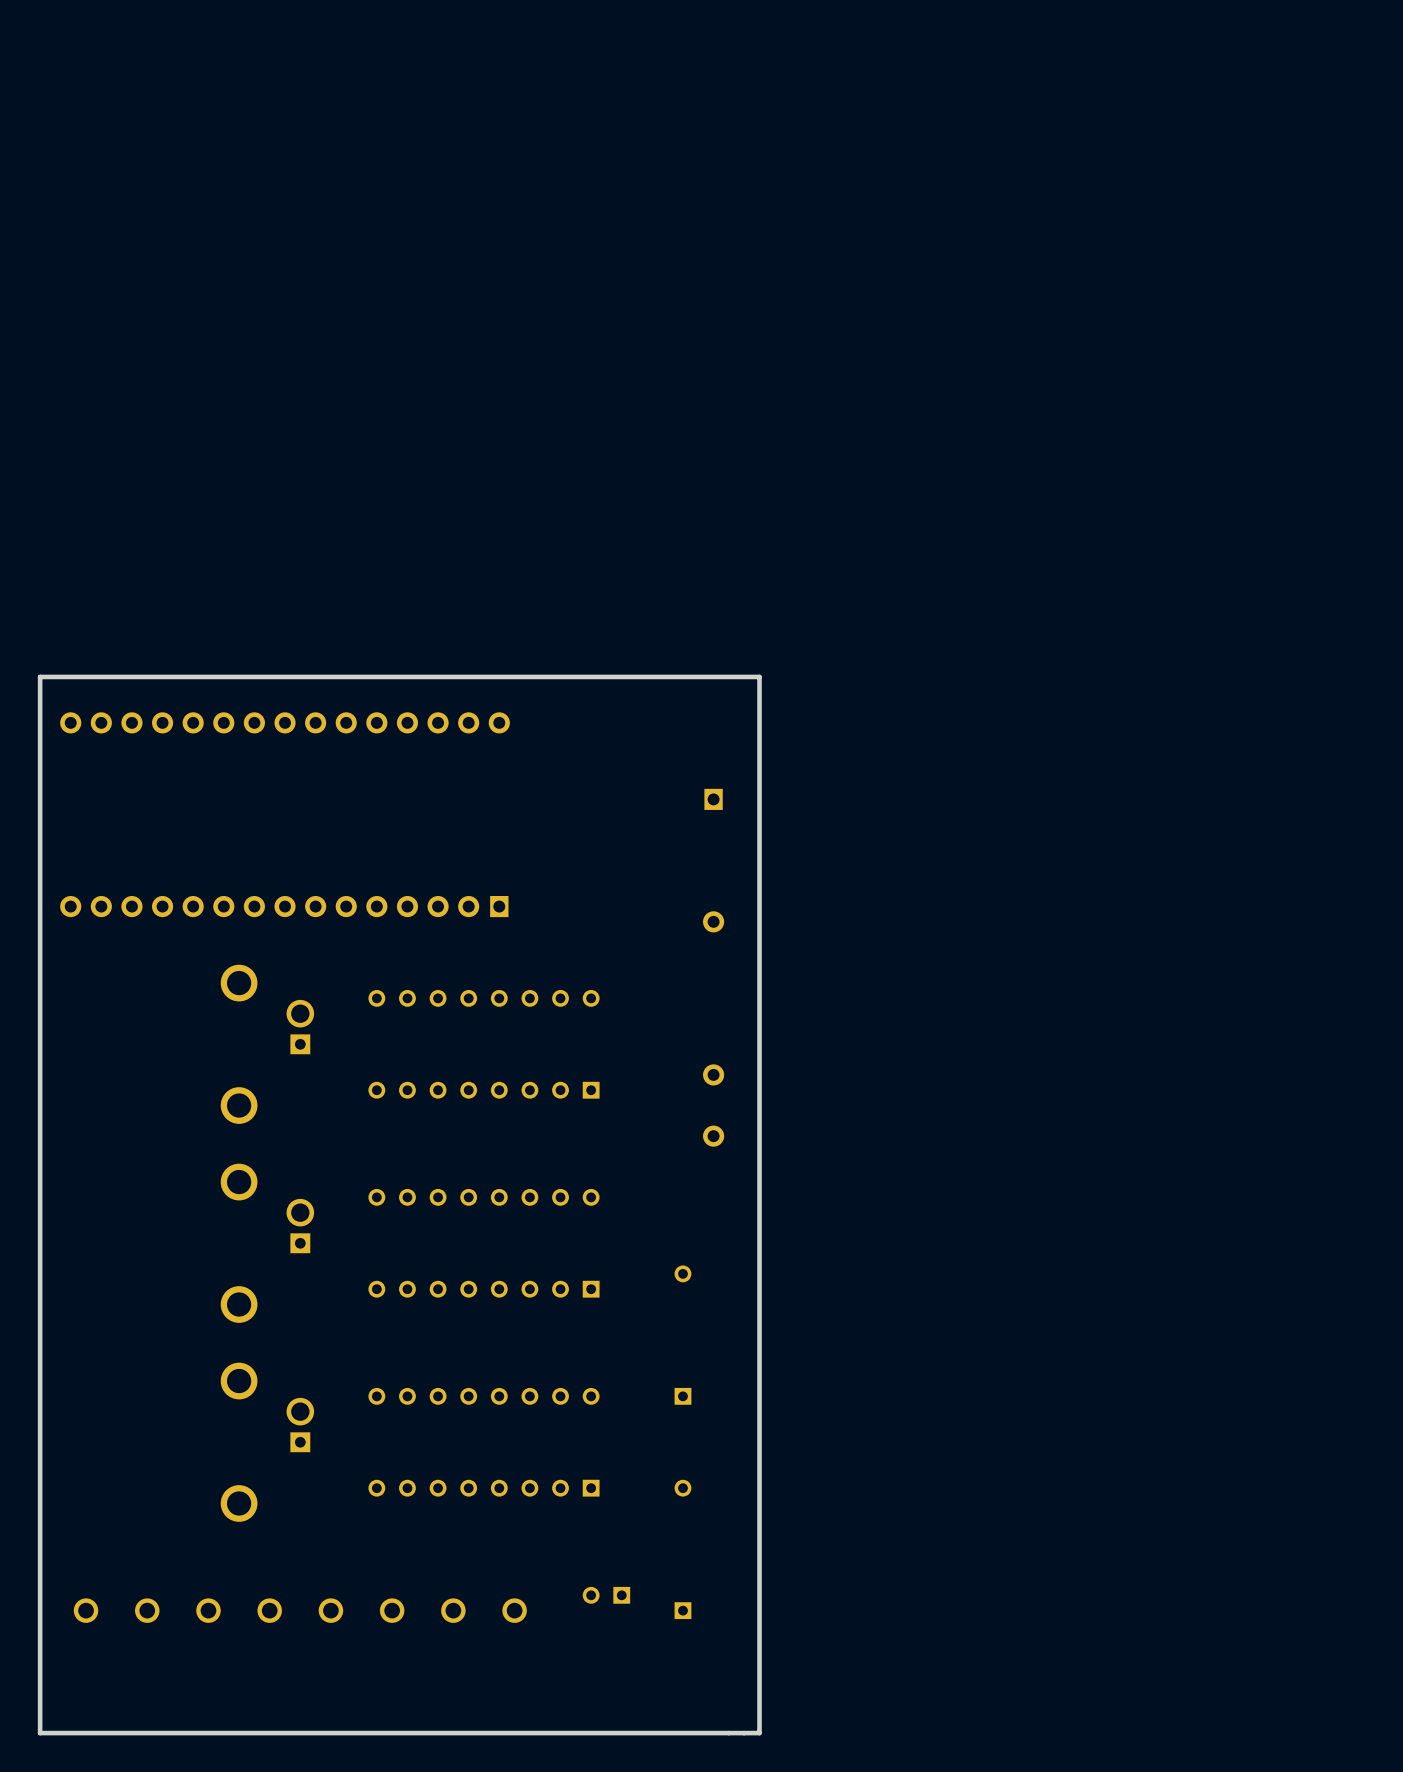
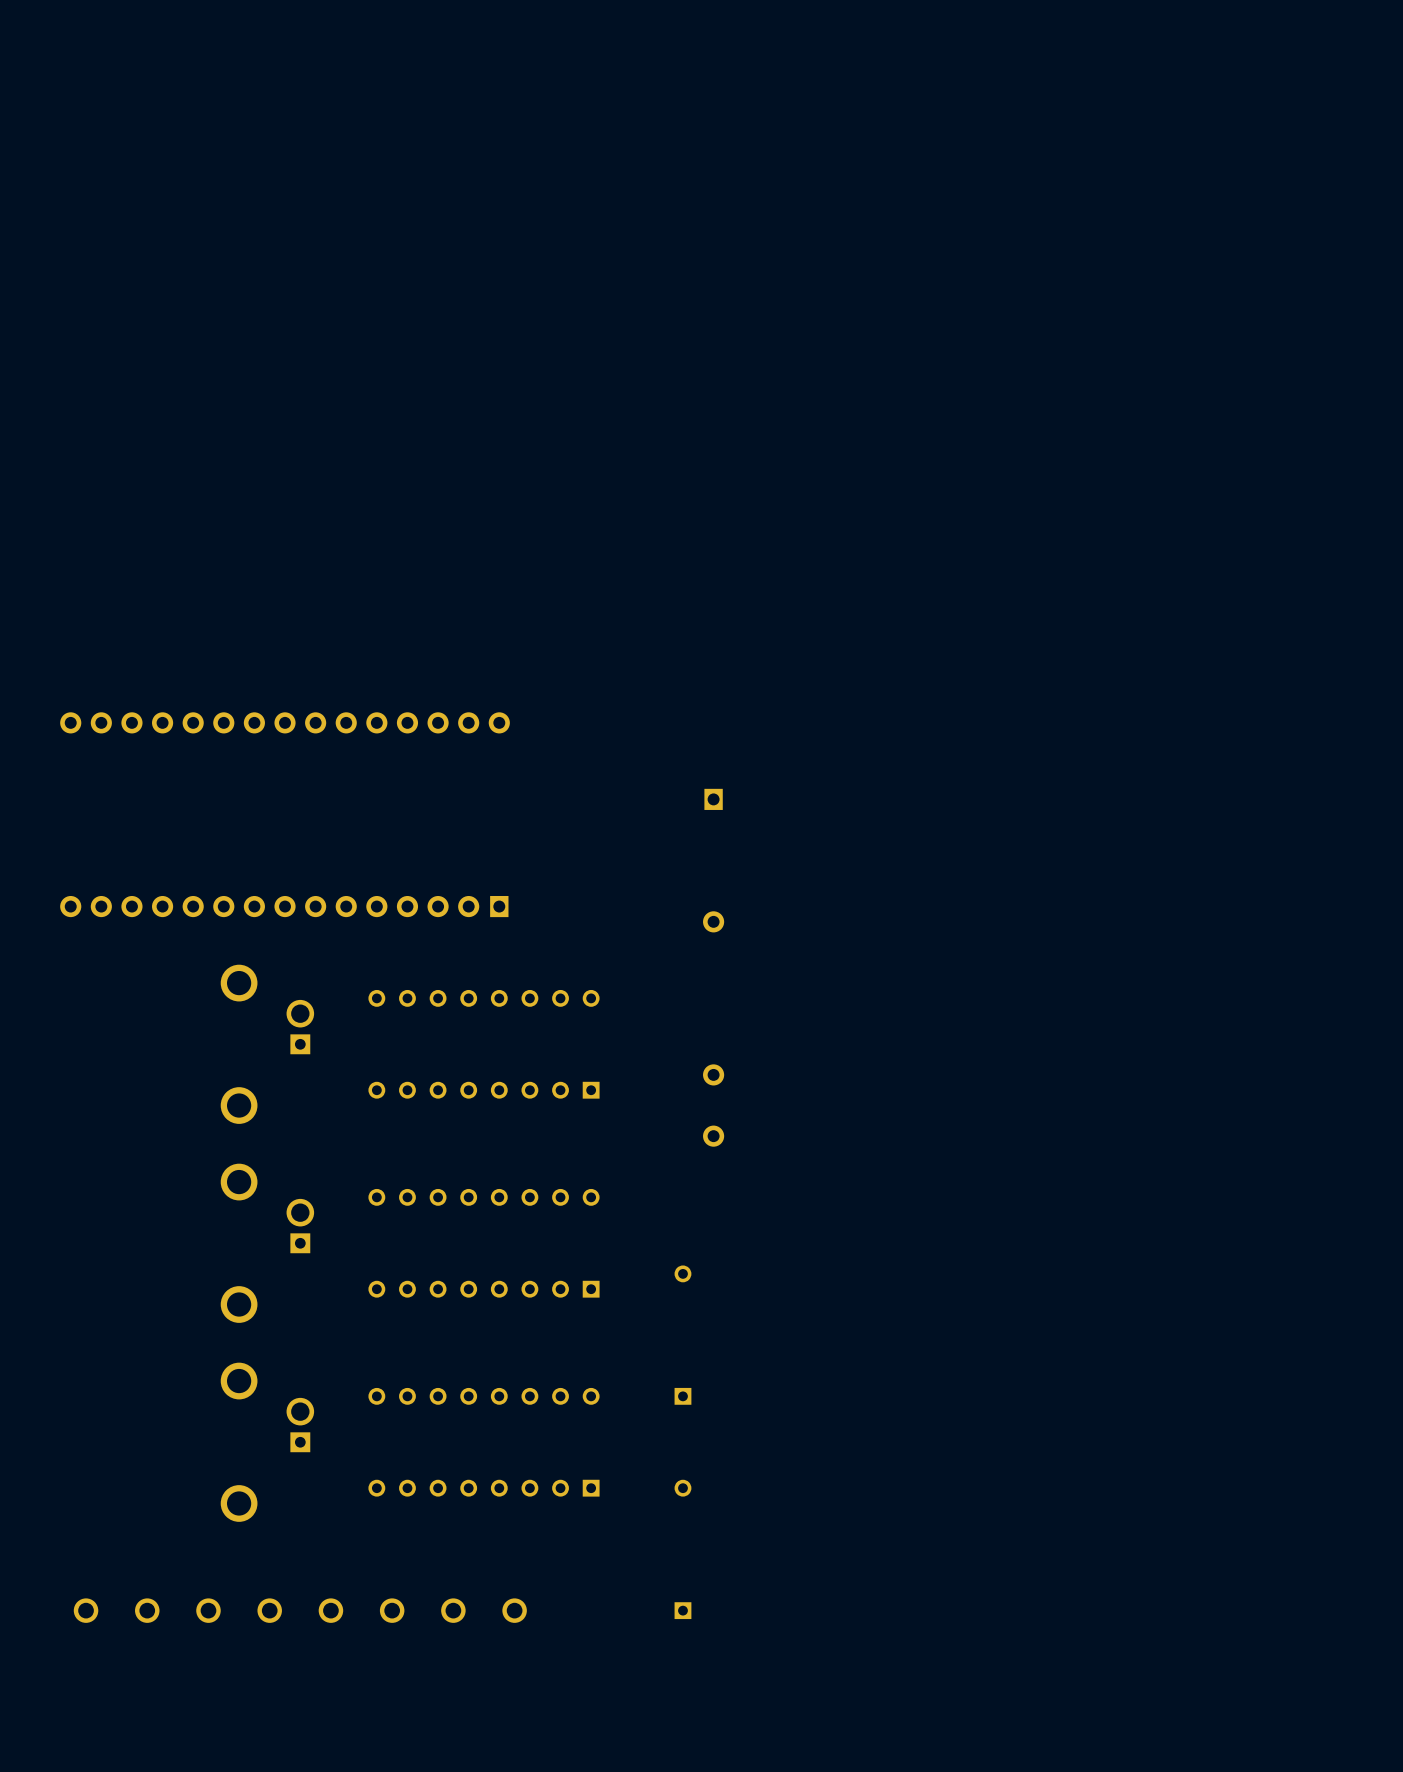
board edge: (759, 676) (759, 1733) (40, 1733) (40, 676) (759, 676) -> none
part: (606, 1595) -> none

